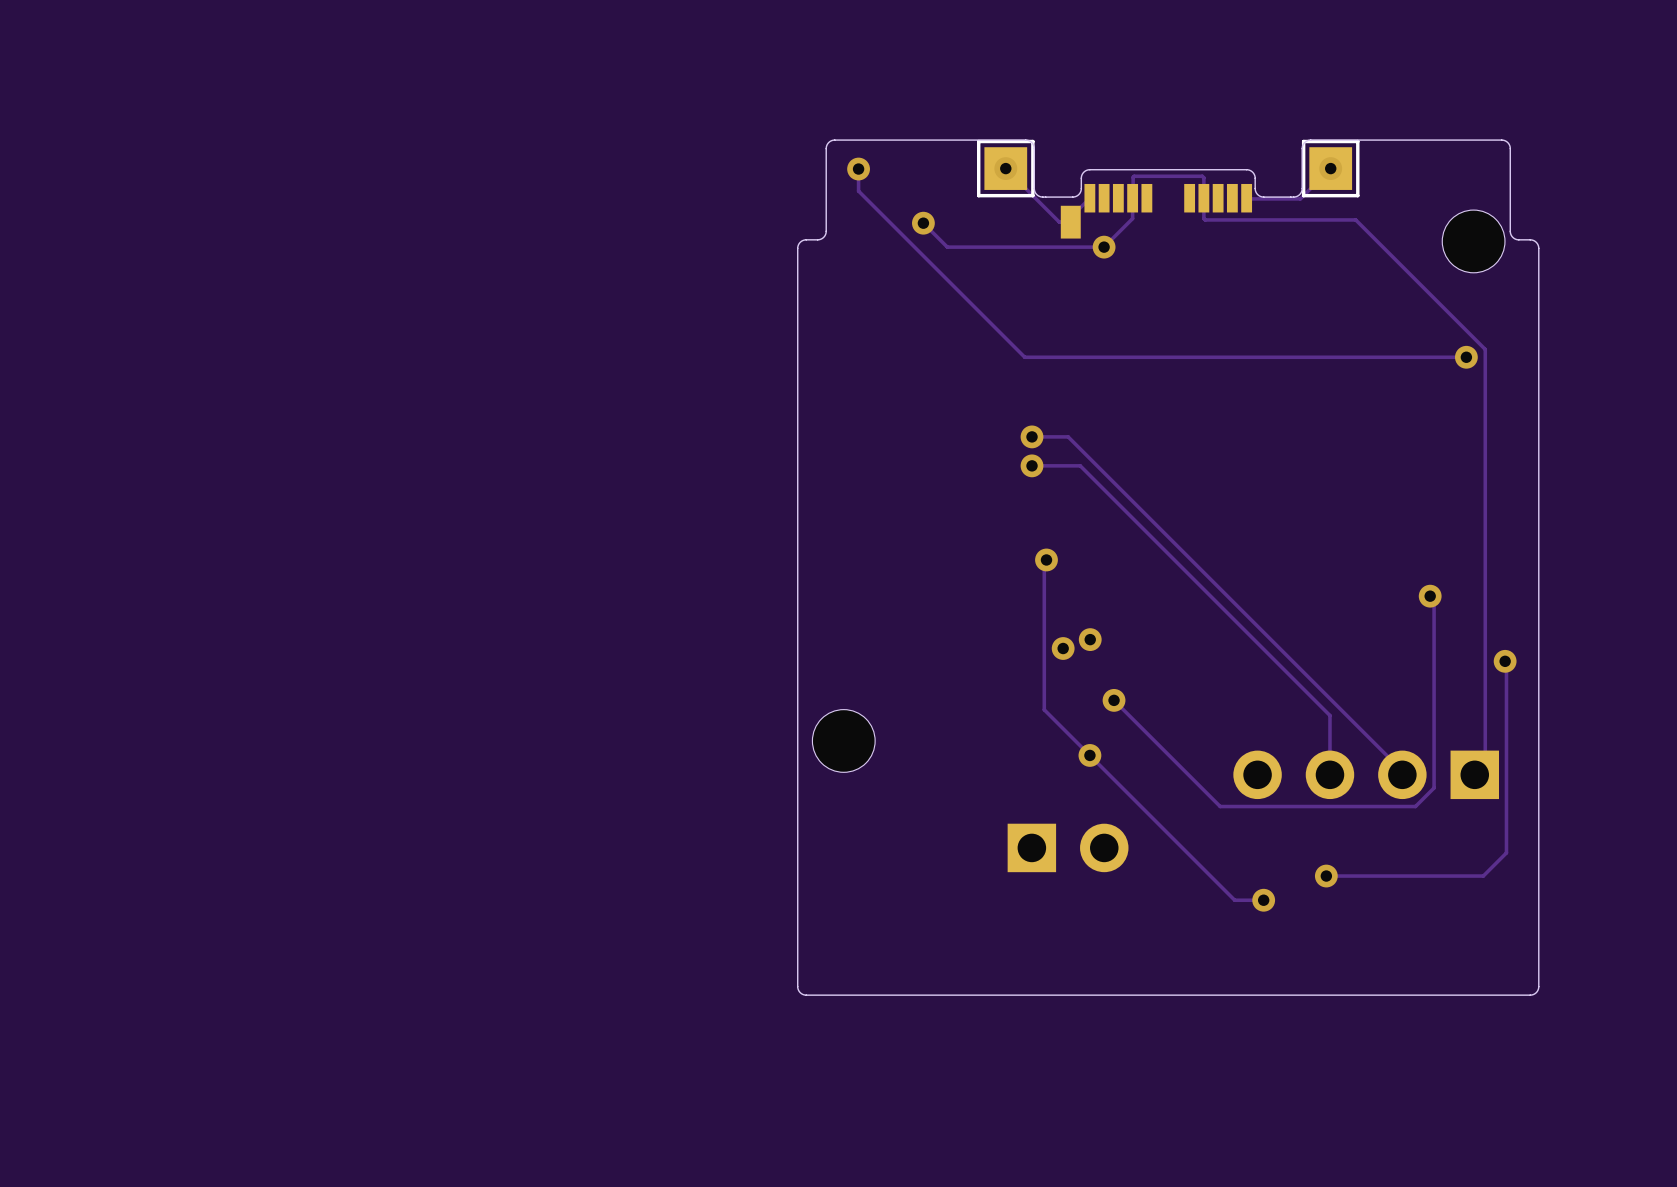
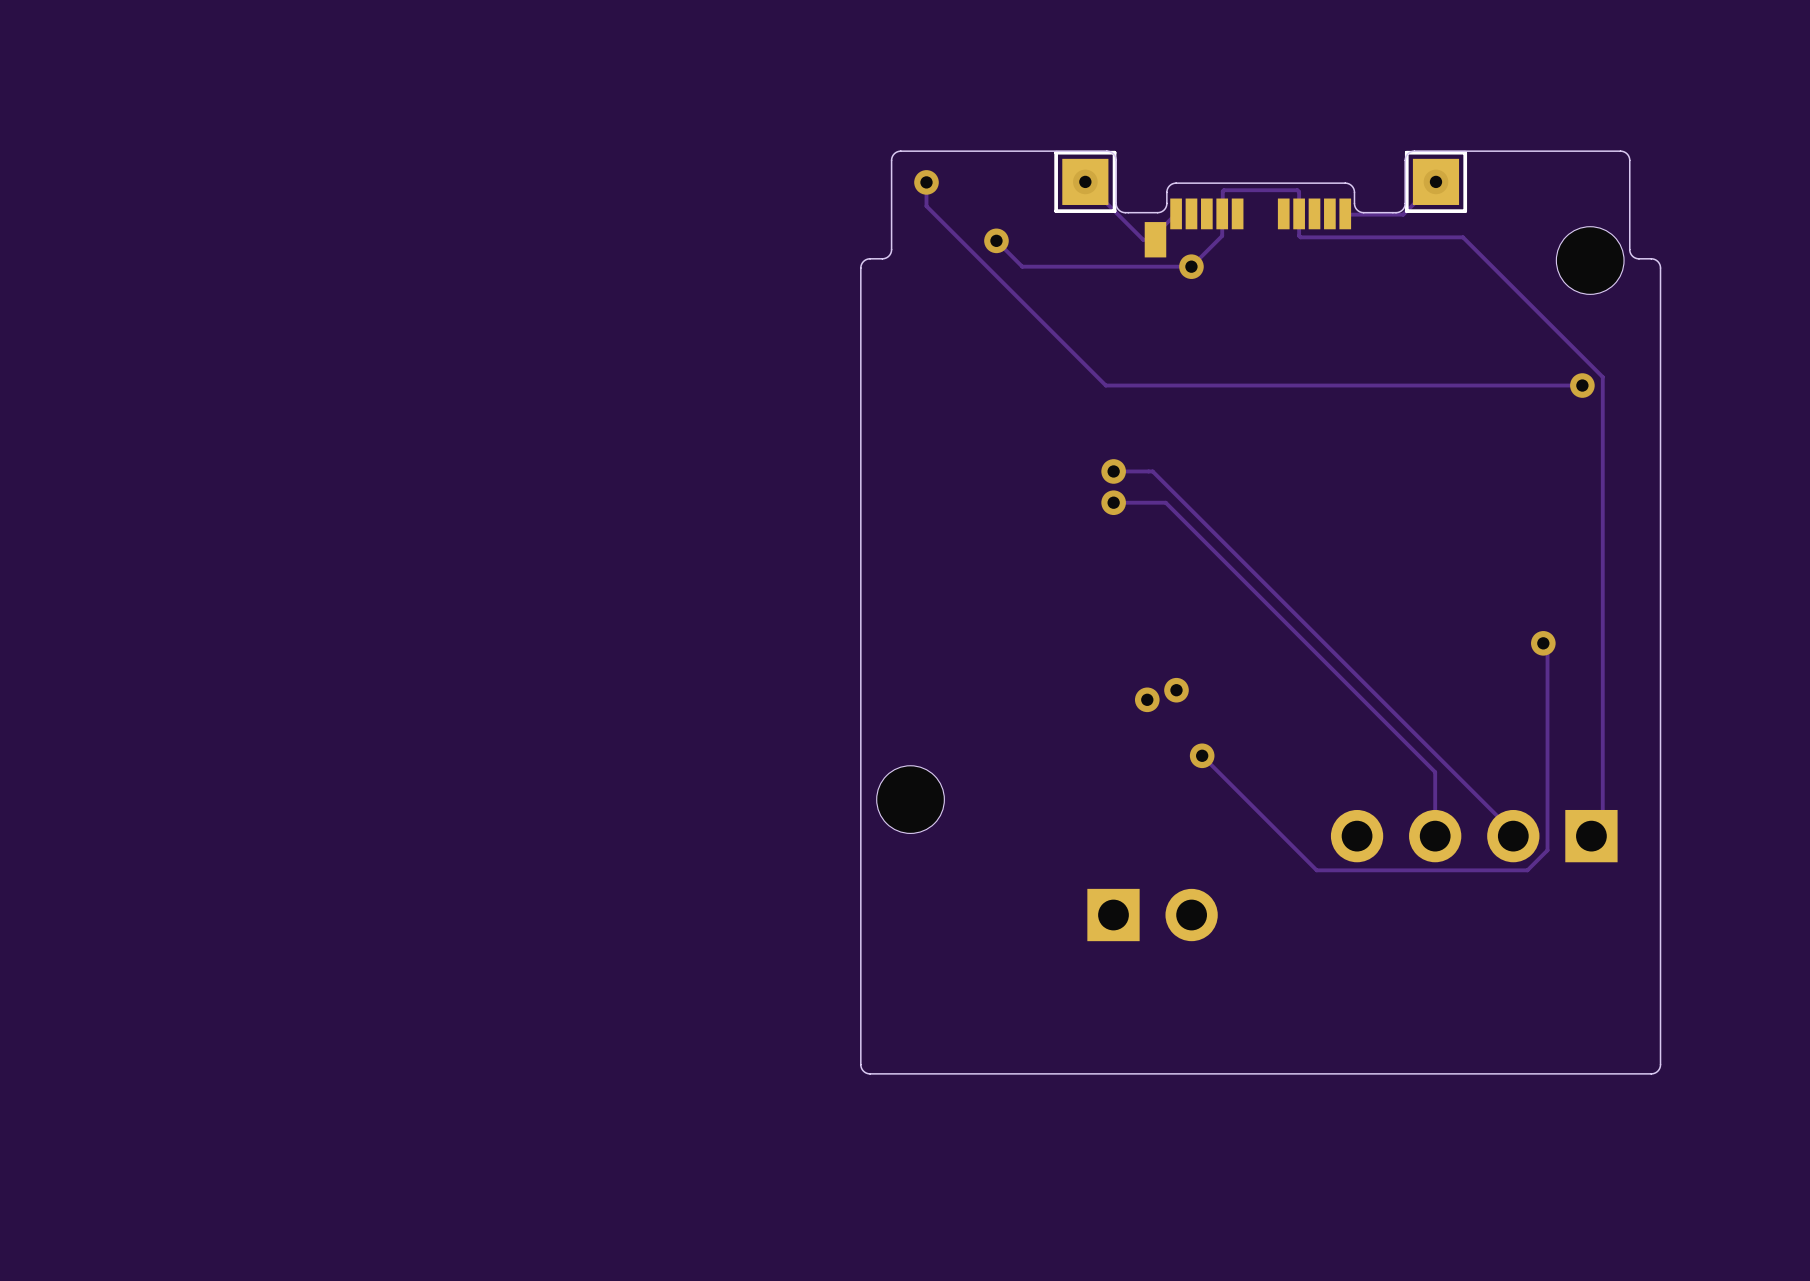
track: (1046, 559) (1044, 562) (1044, 709) (1234, 900) (1263, 900) -> none
via: (1046, 559) -> none
track: (1505, 661) (1506, 852) (1483, 876) (1326, 876) -> none
via: (1505, 661) -> none
via: (1089, 755) -> none
via: (1326, 876) -> none
via: (1263, 900) -> none

